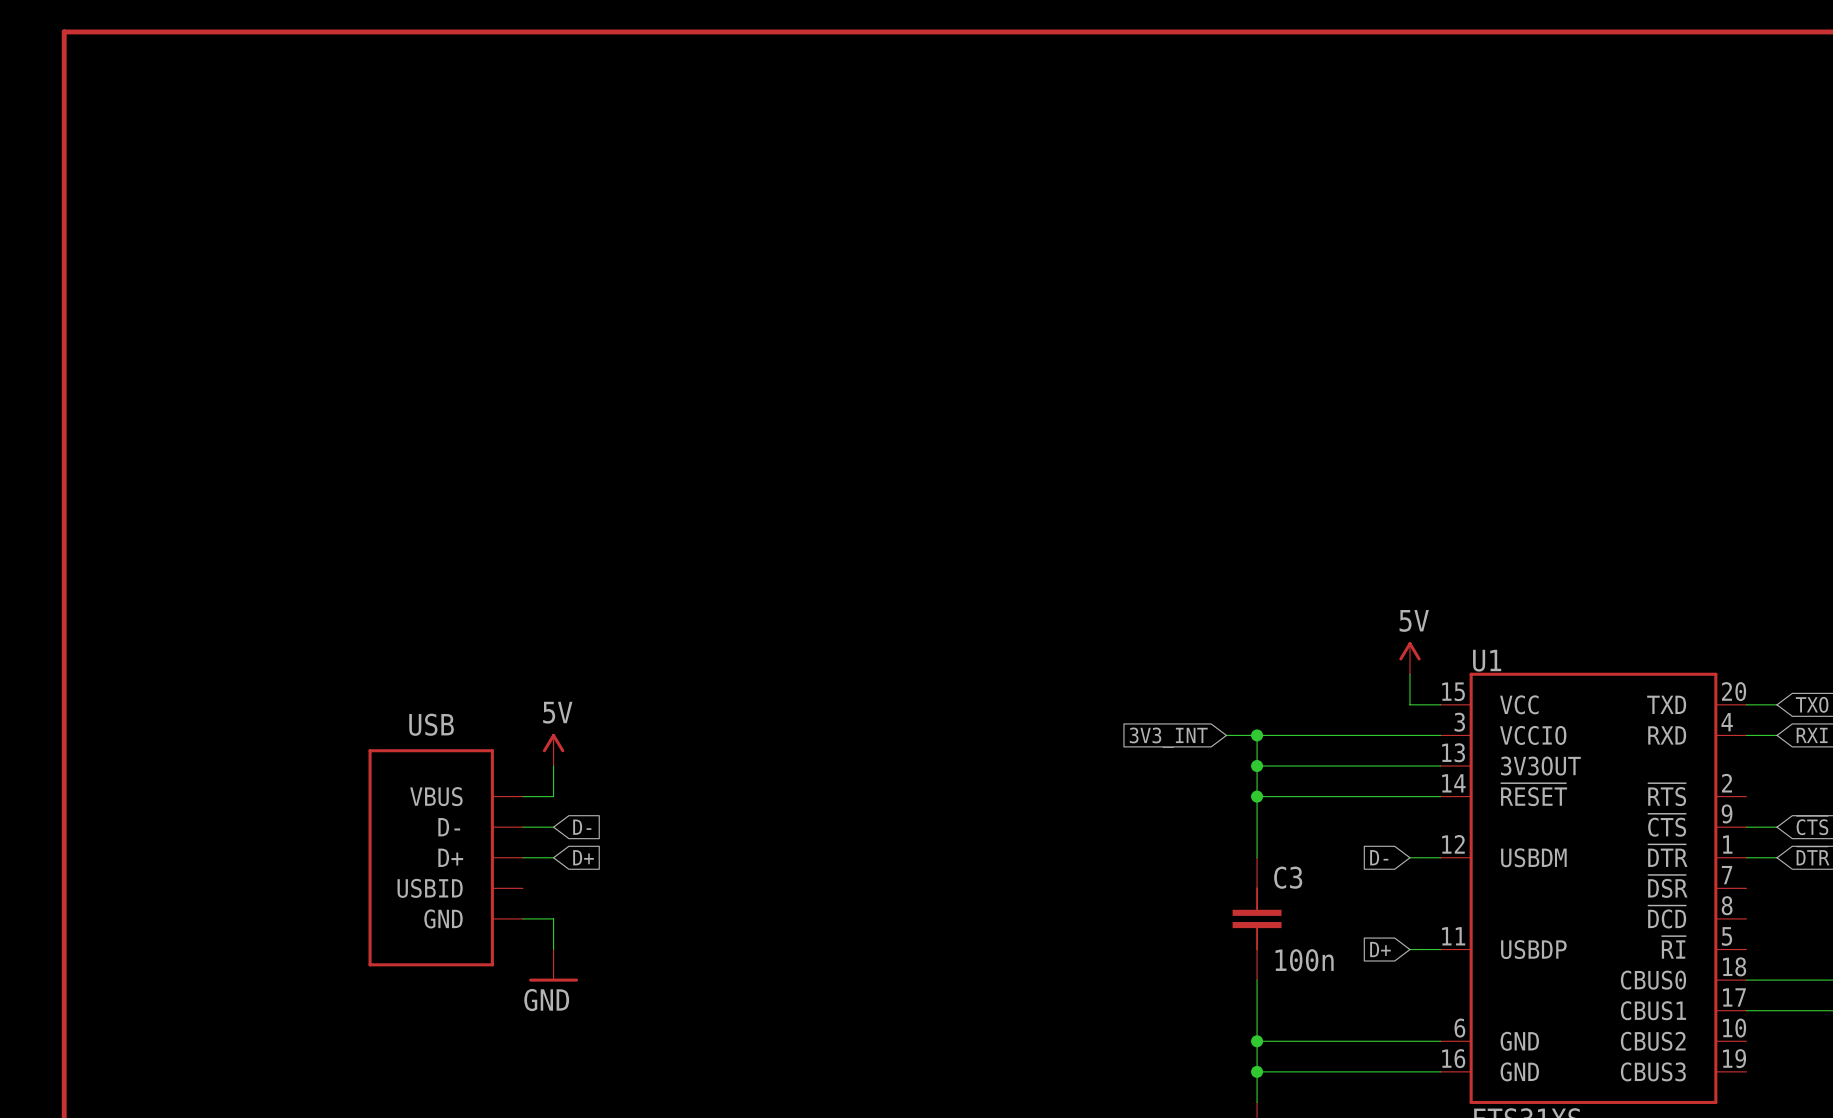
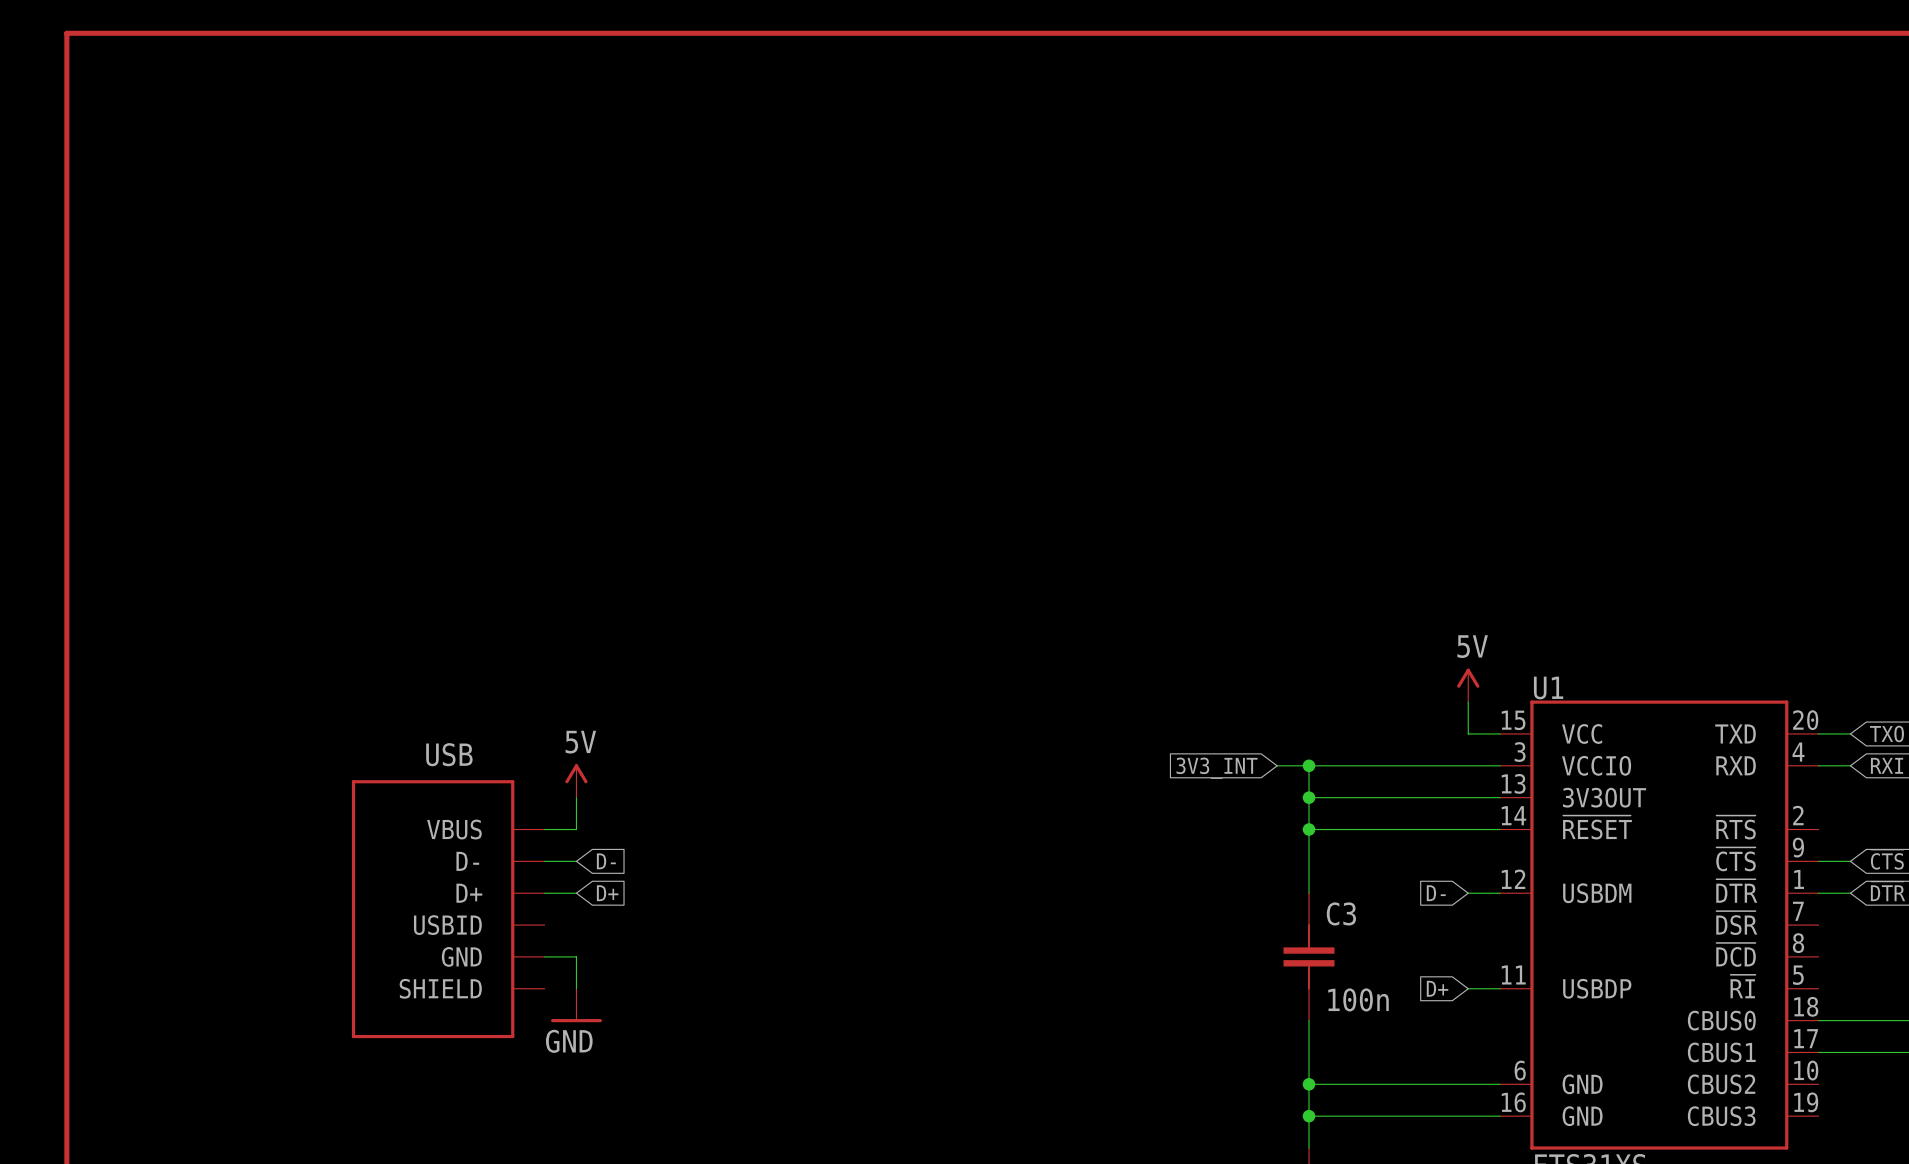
USB: (445, 857) -> none
USB: none -> (448, 909)

